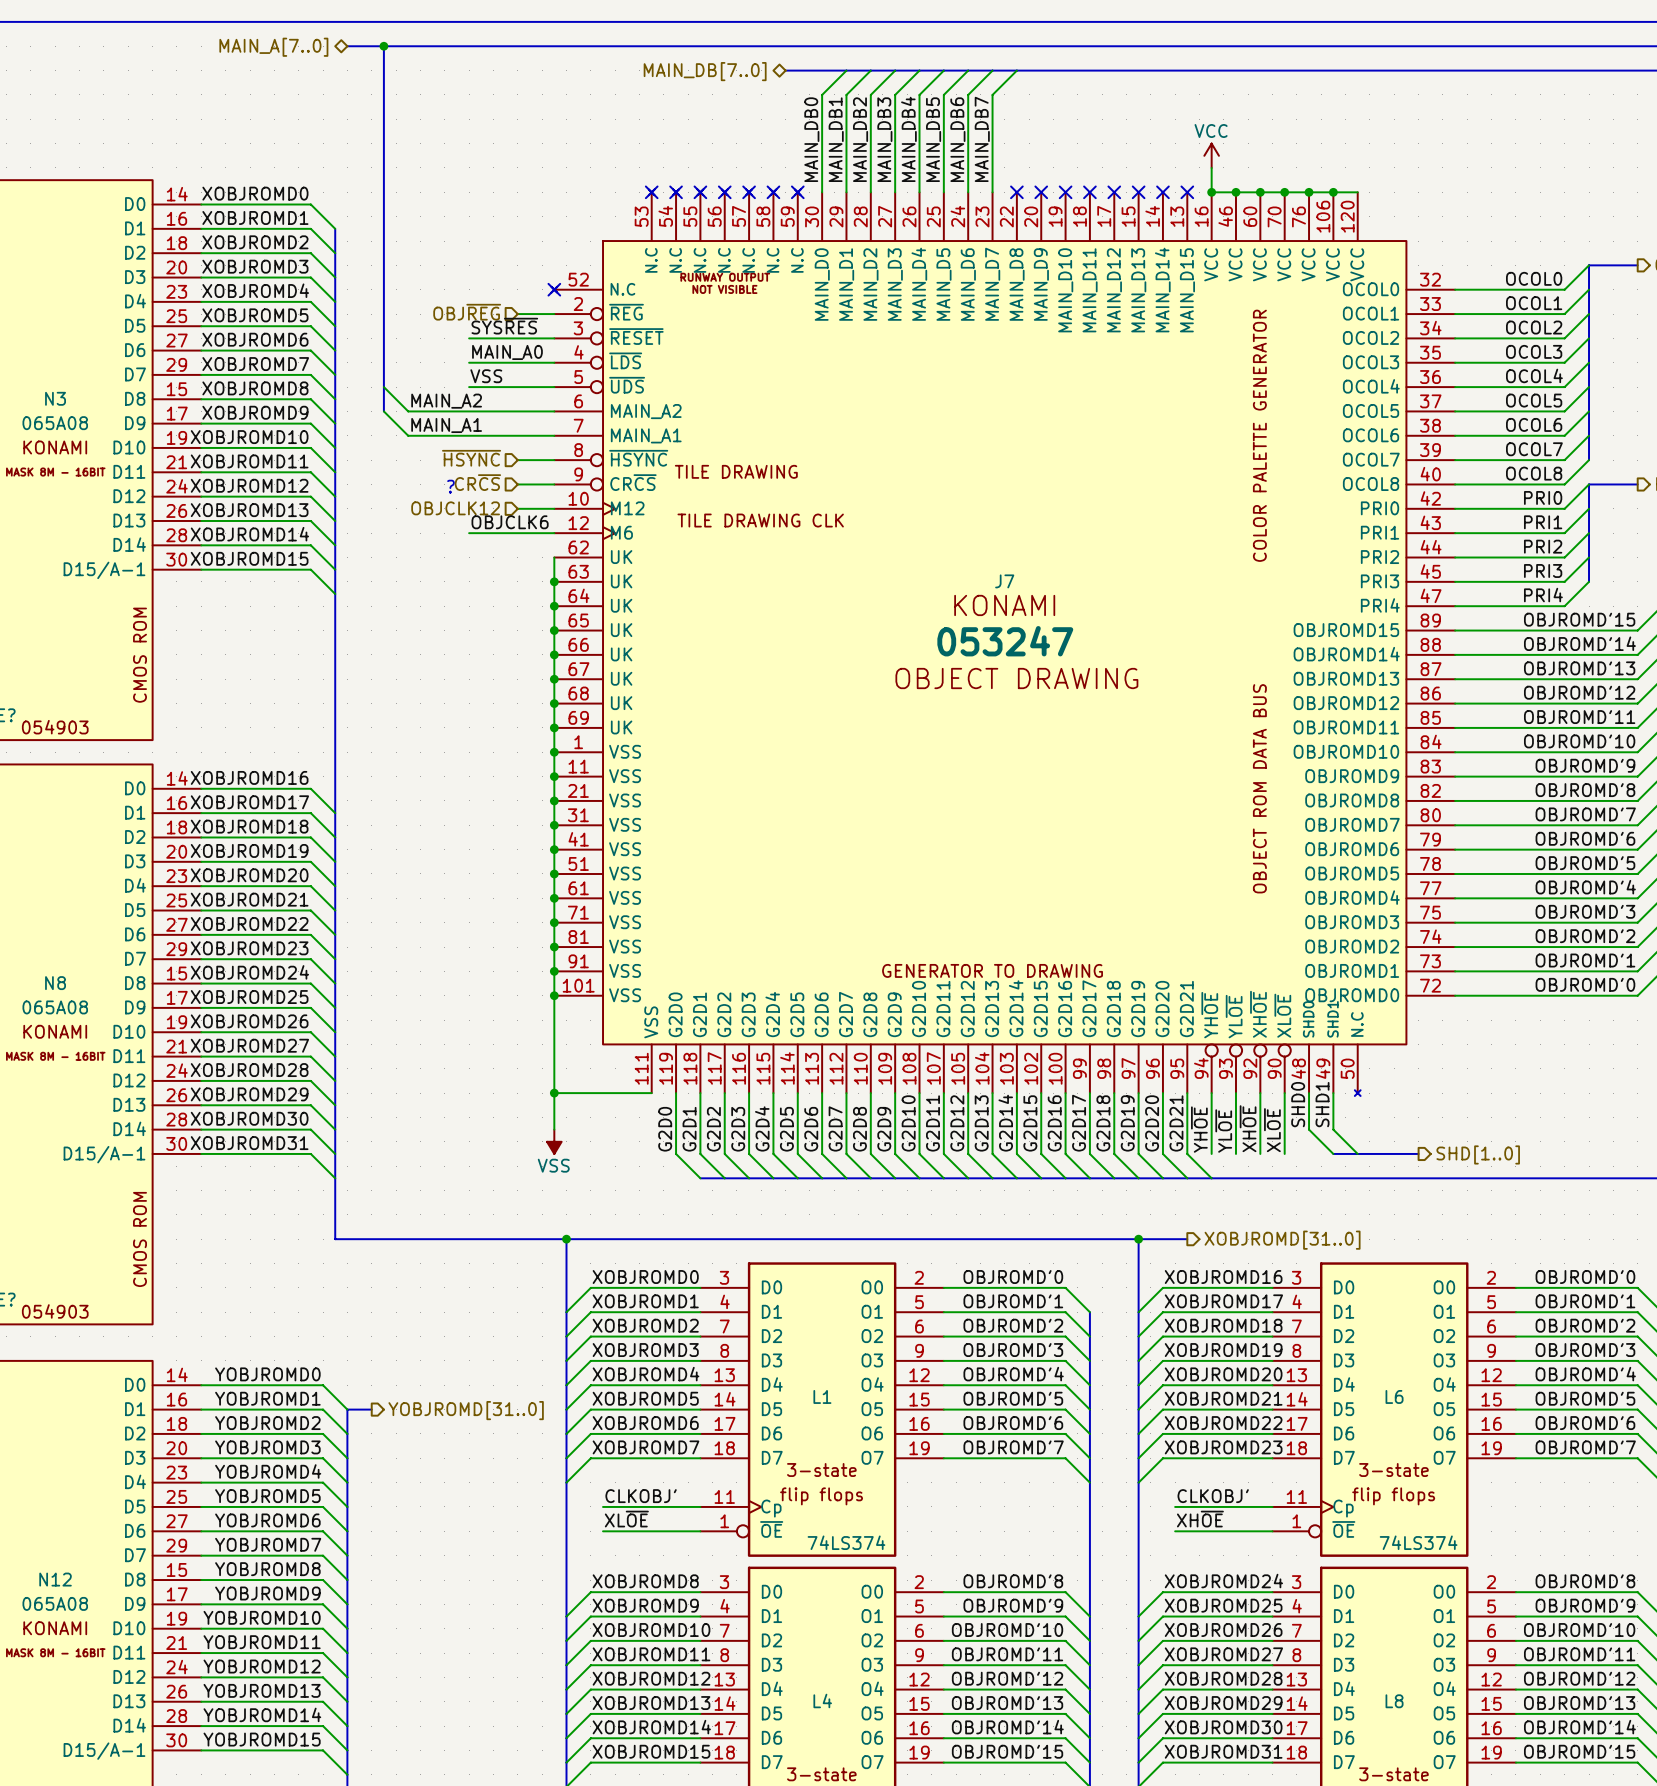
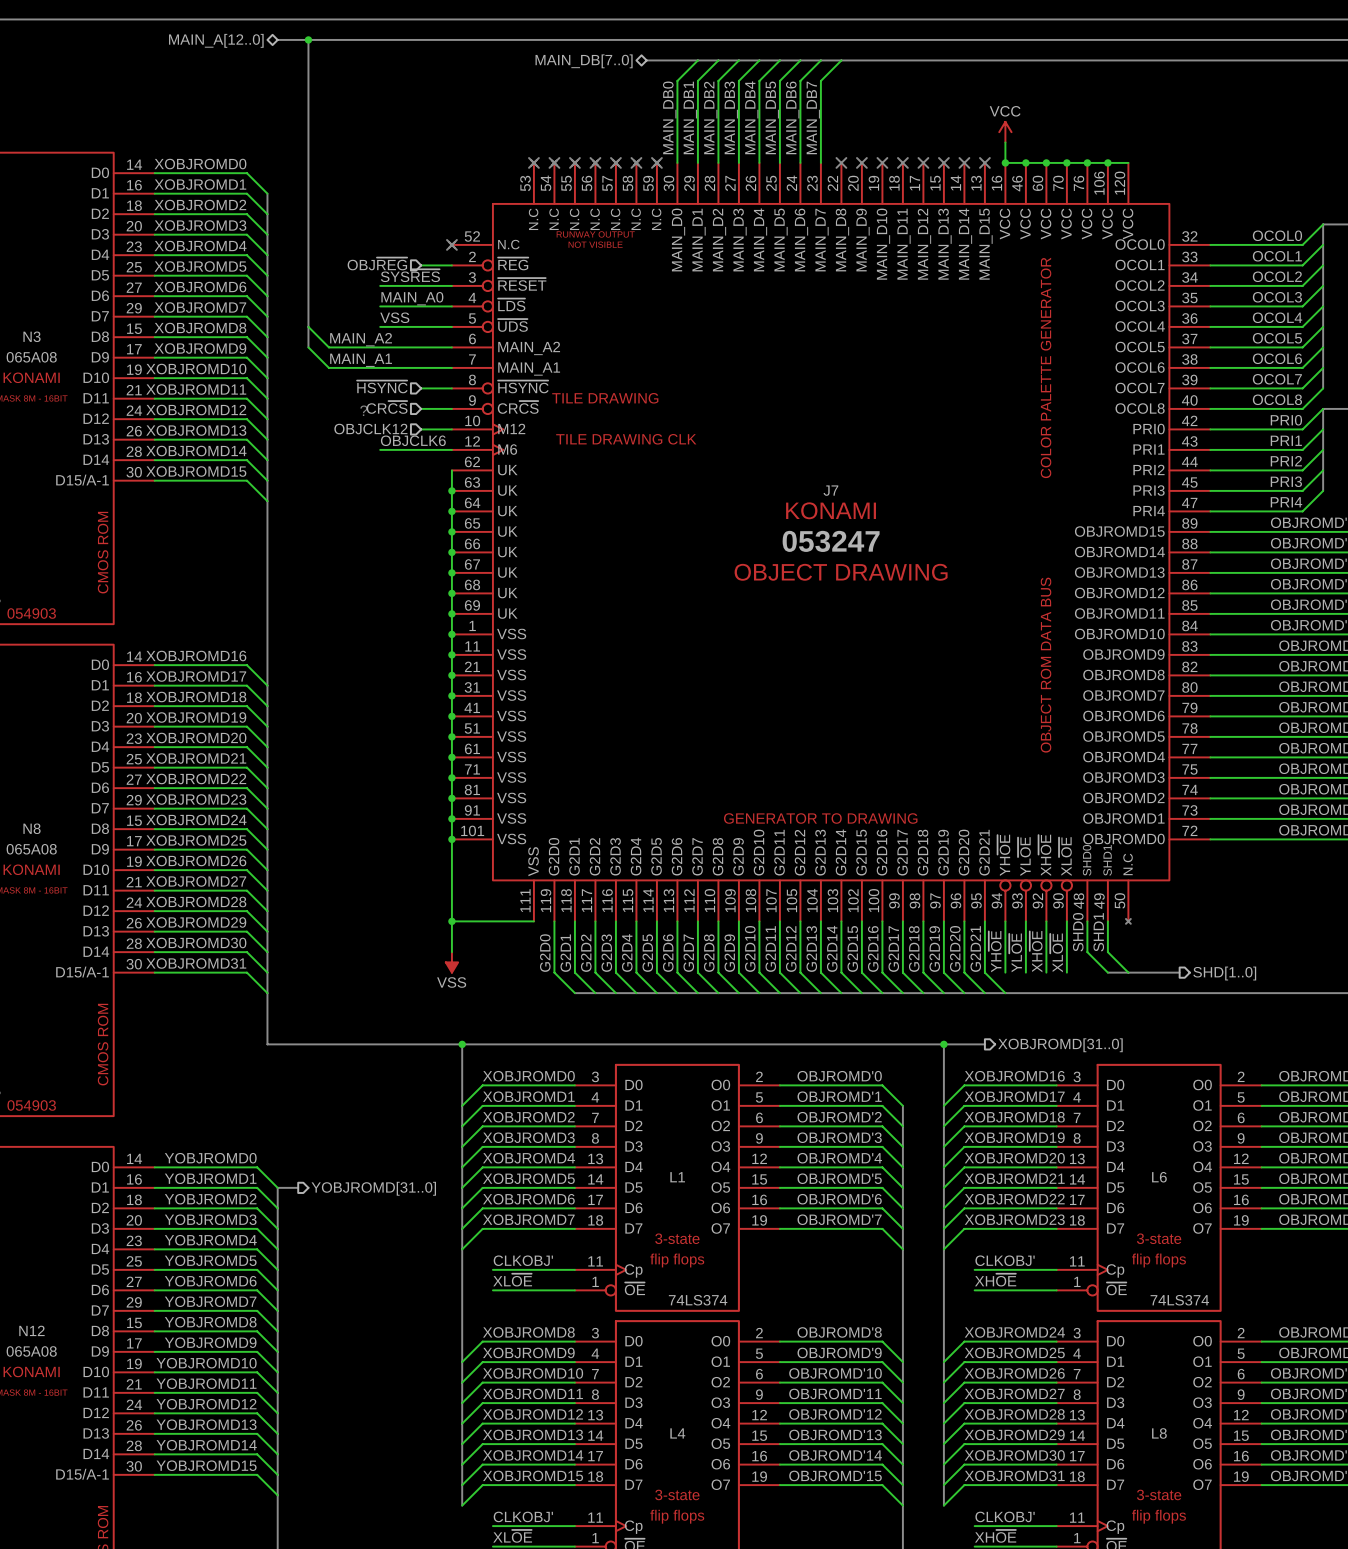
hierarchical label: MAIN_A[7..0] (273, 47) -> MAIN_A[12..0] (216, 40)

